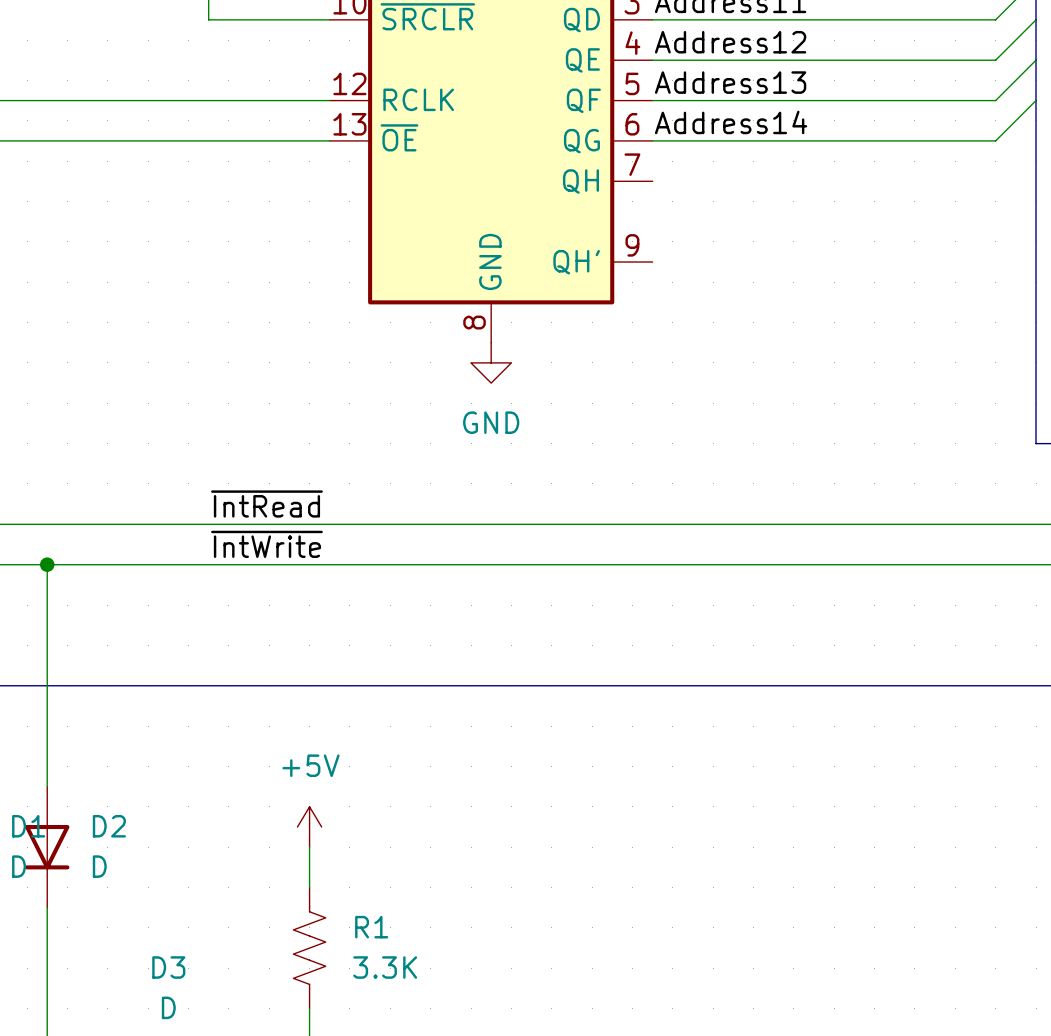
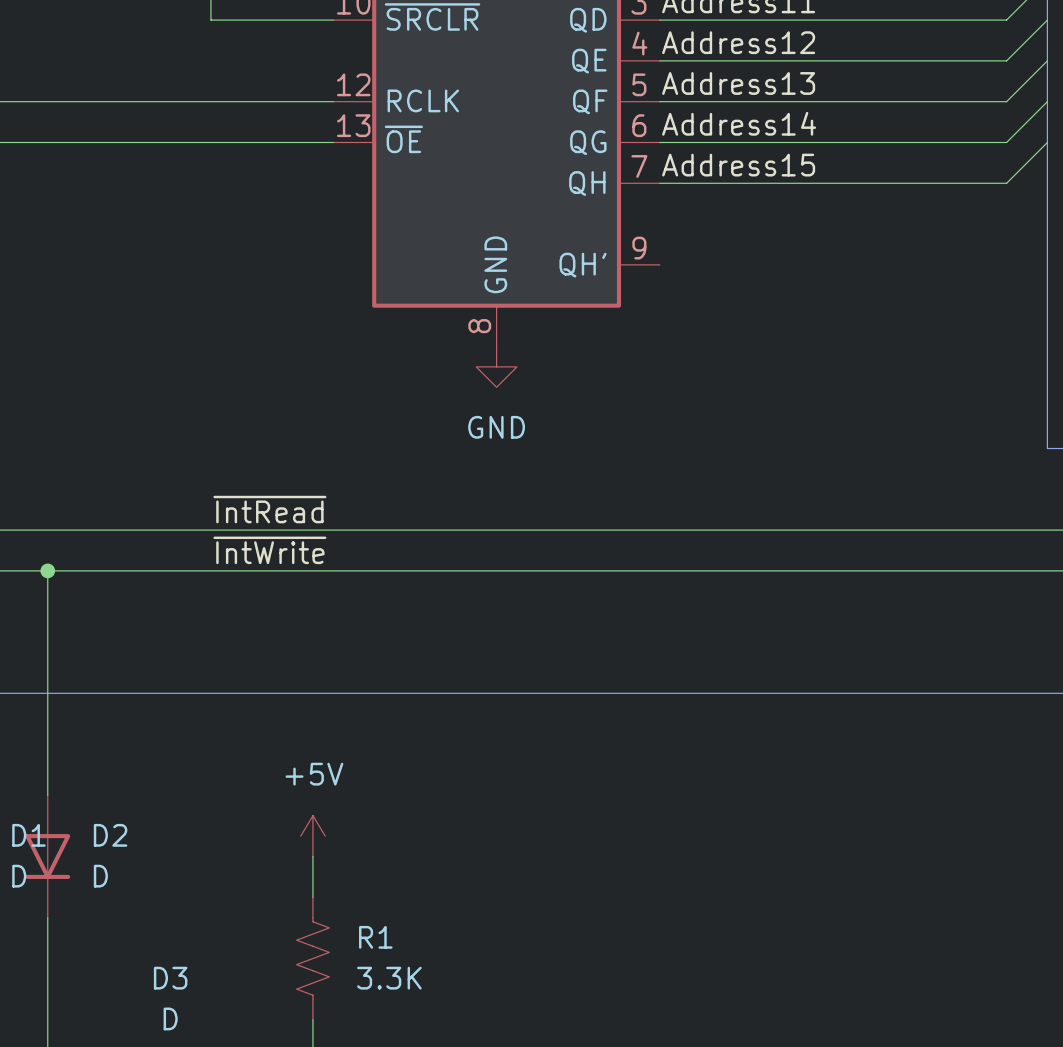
wire: none -> (1047, 142) (1006, 183) (659, 183)
label: none -> Address15 (738, 165)

